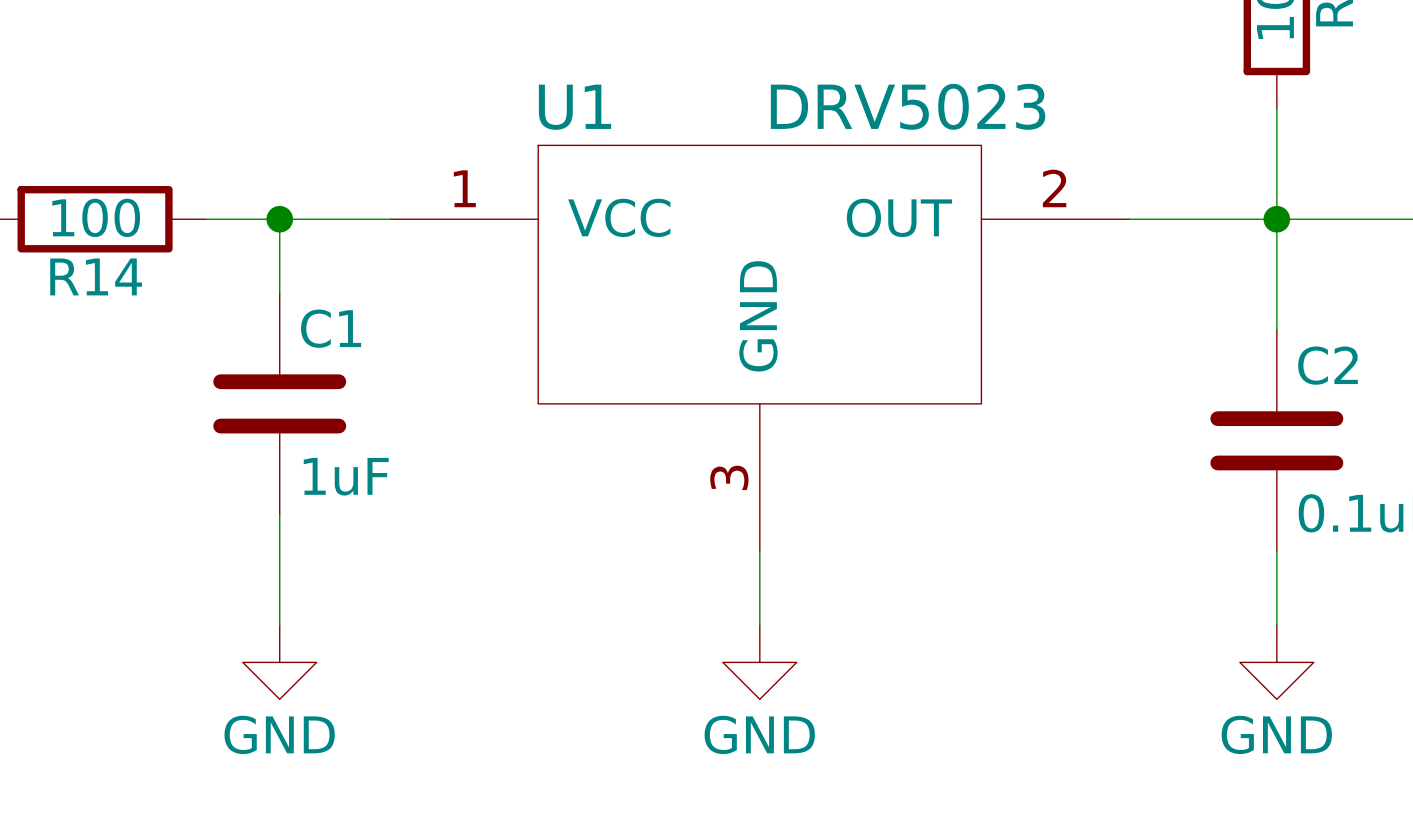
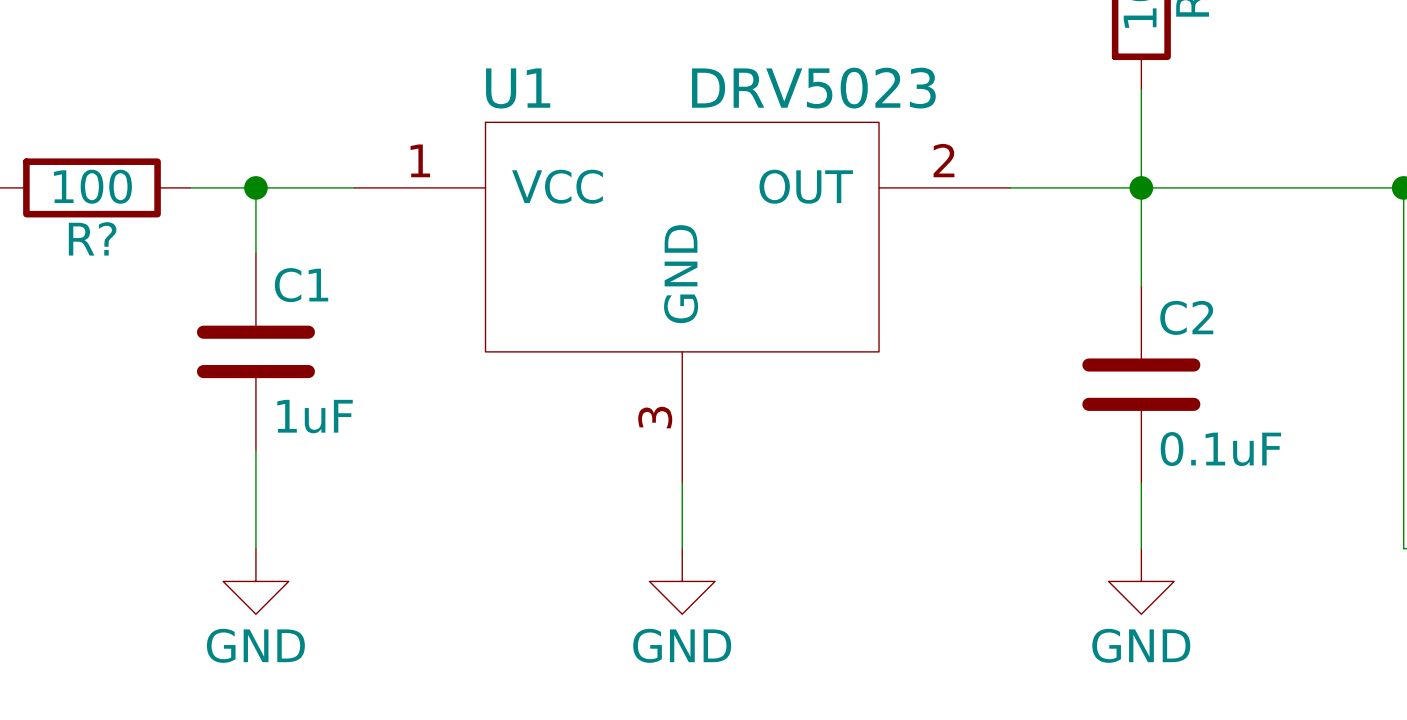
R14 name: R14 (96, 276) -> R? (92, 238)

